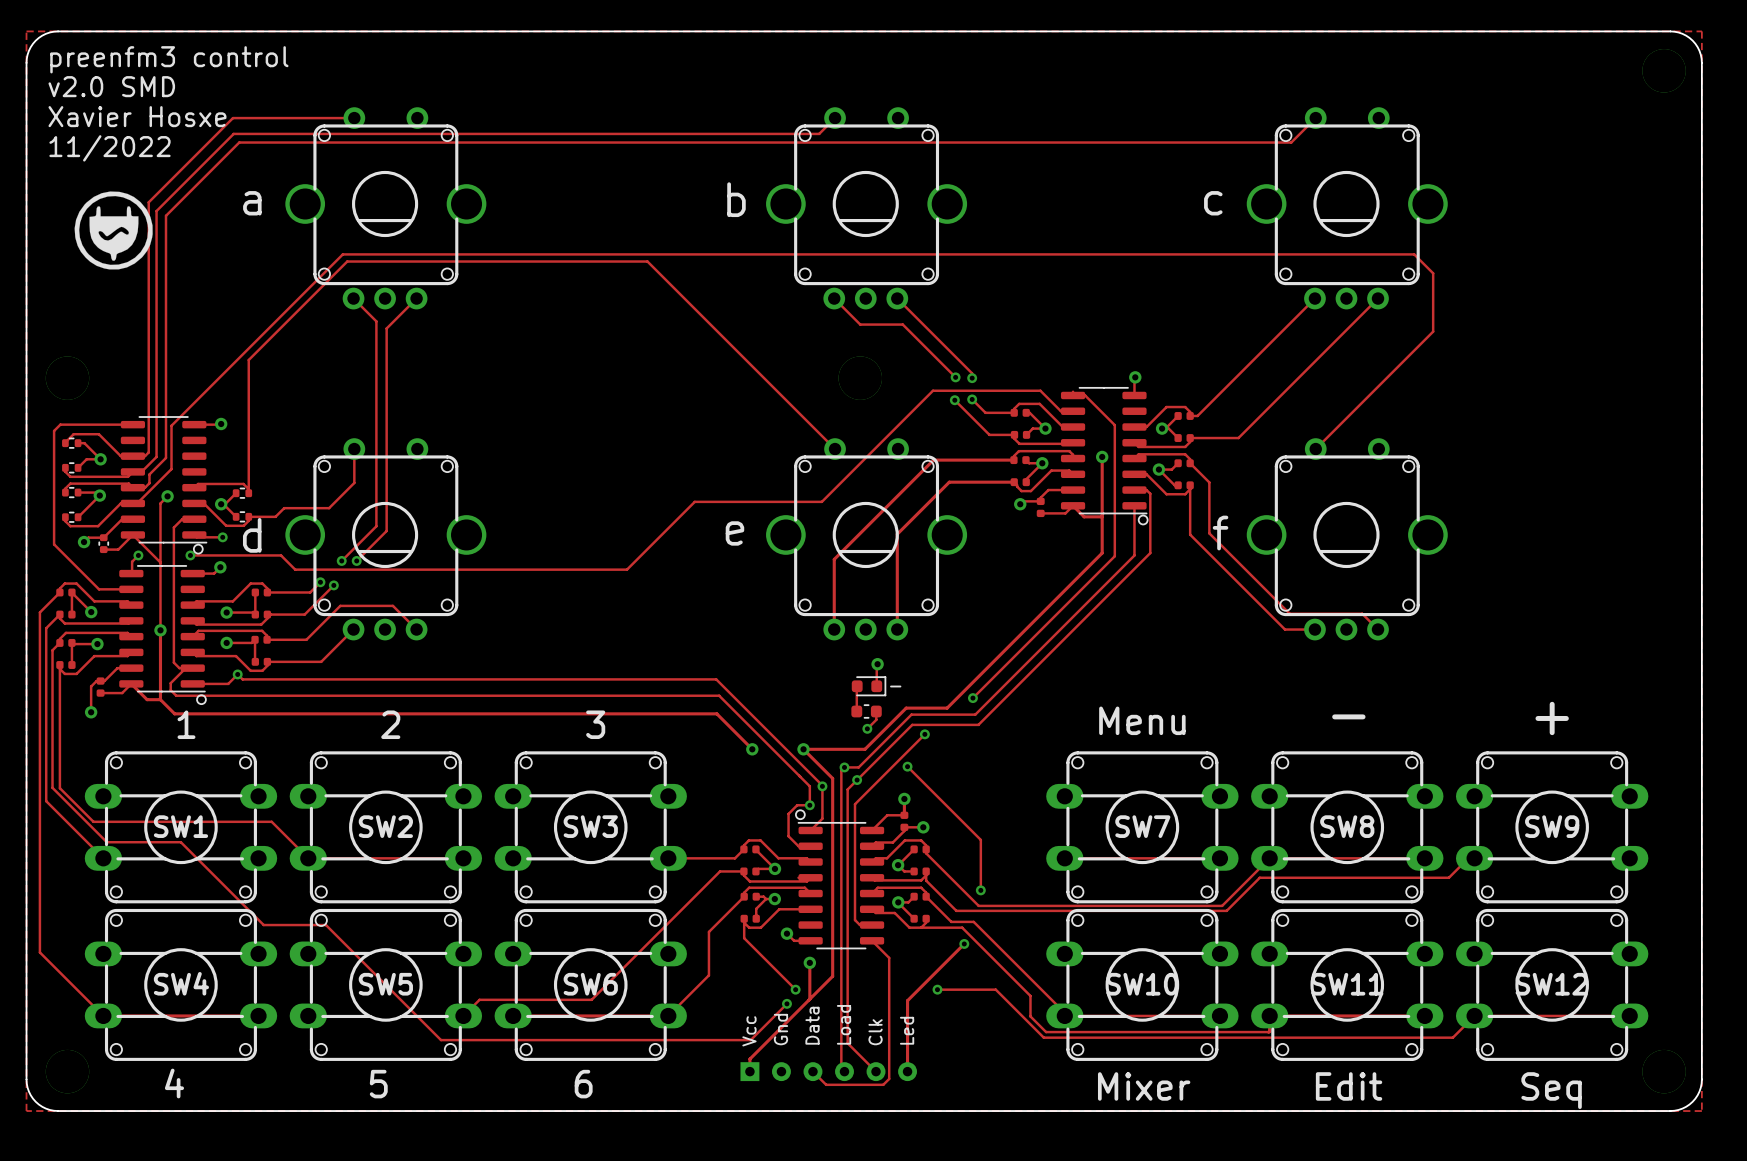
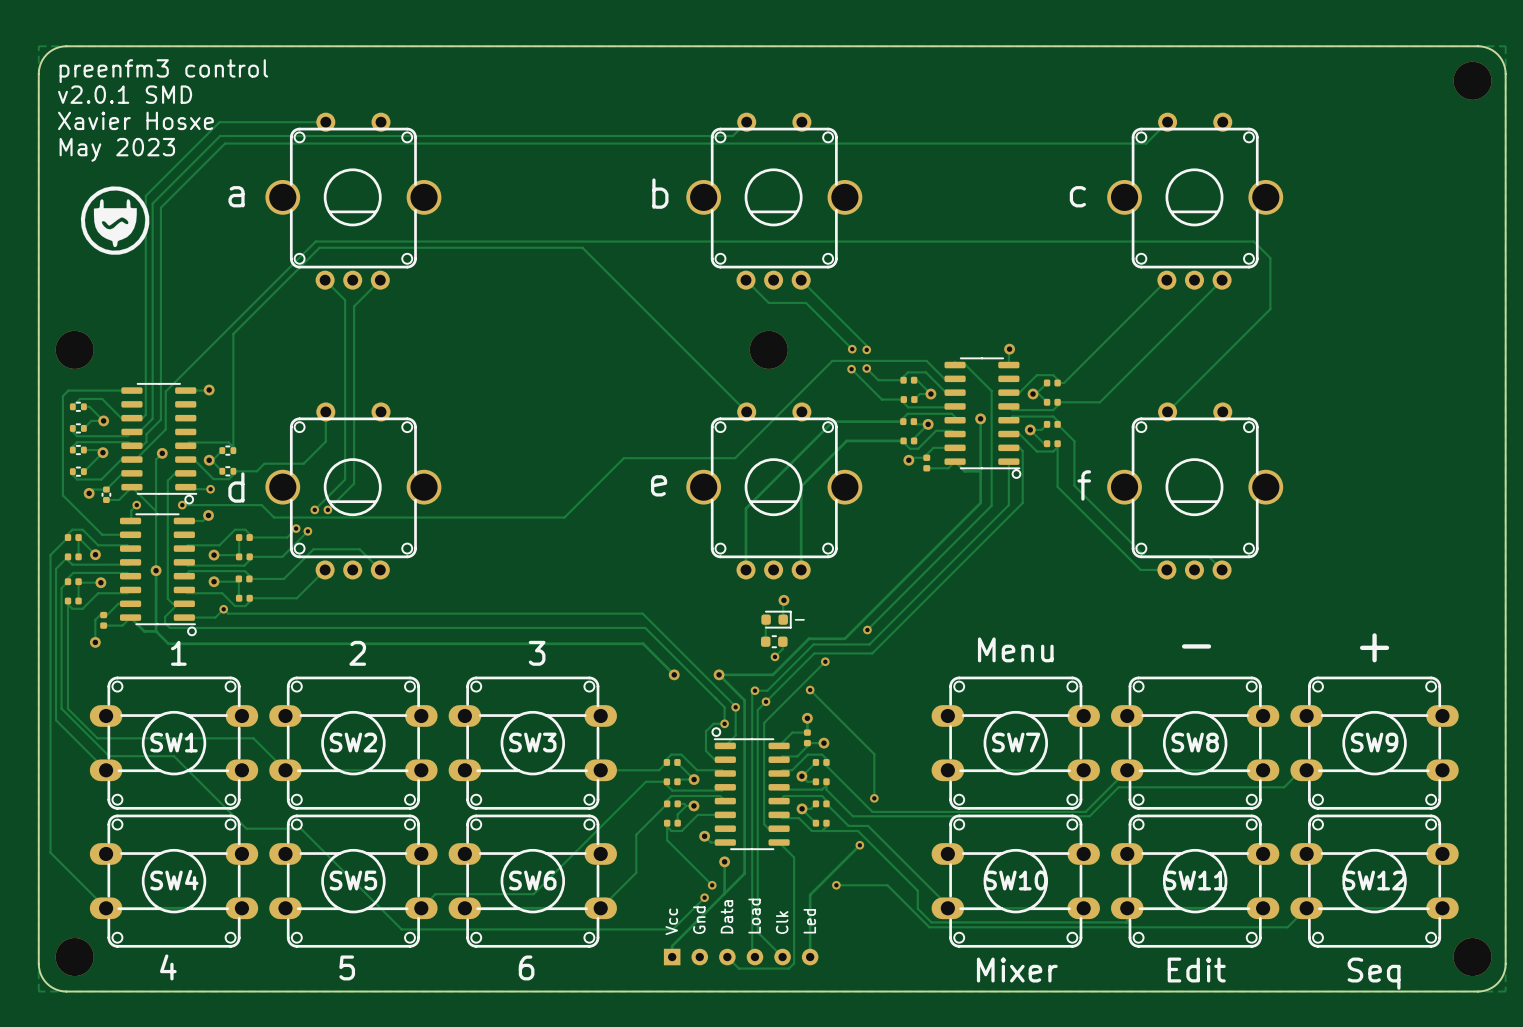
text: v2.0 SMD (111, 86) -> v2.0.1 SMD (125, 94)
text: 11/2022 (109, 148) -> May 2023 (117, 149)

